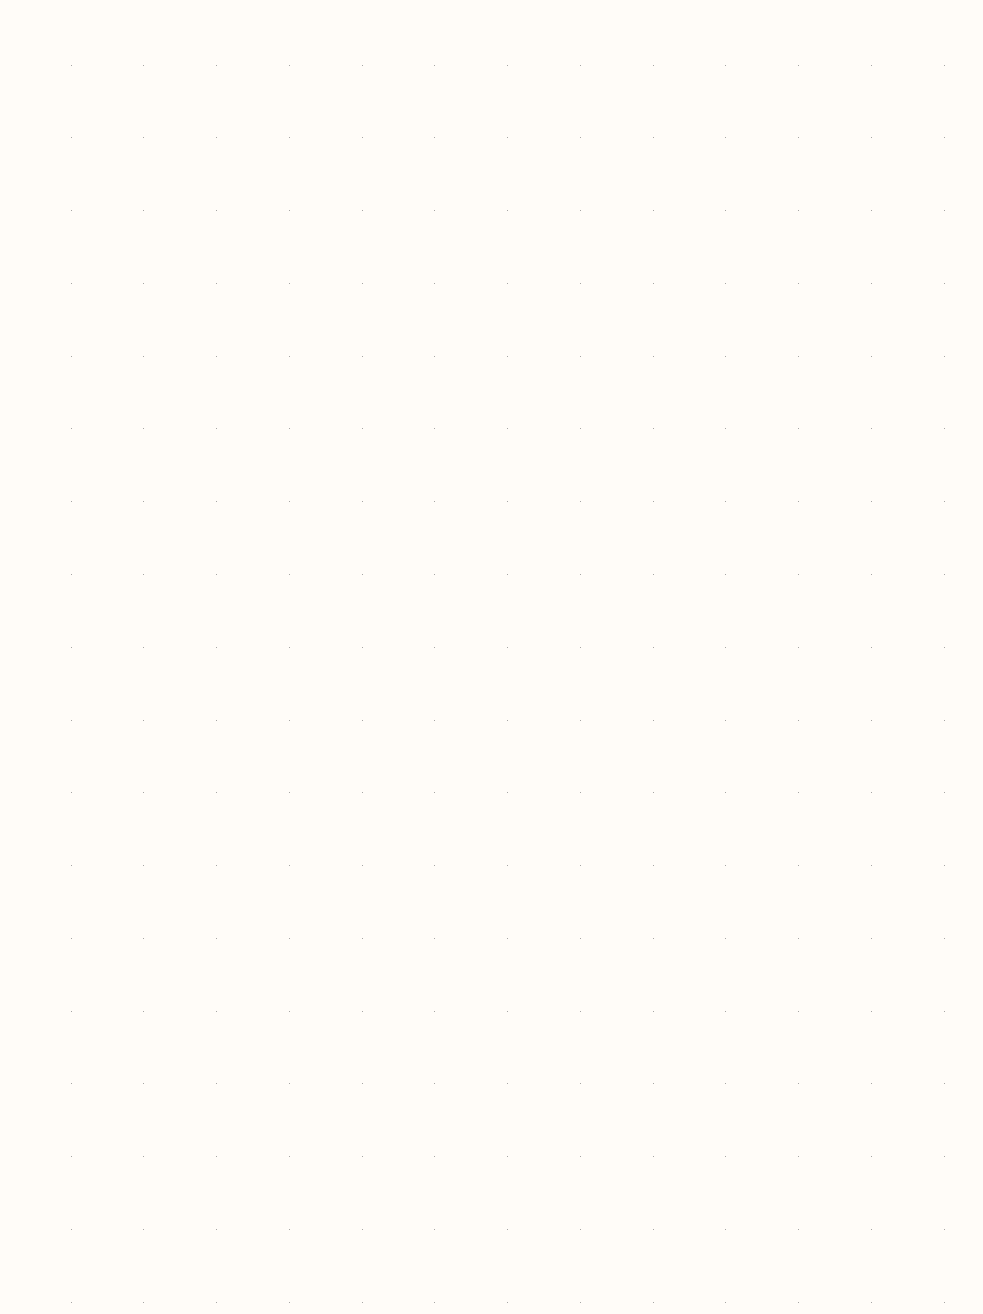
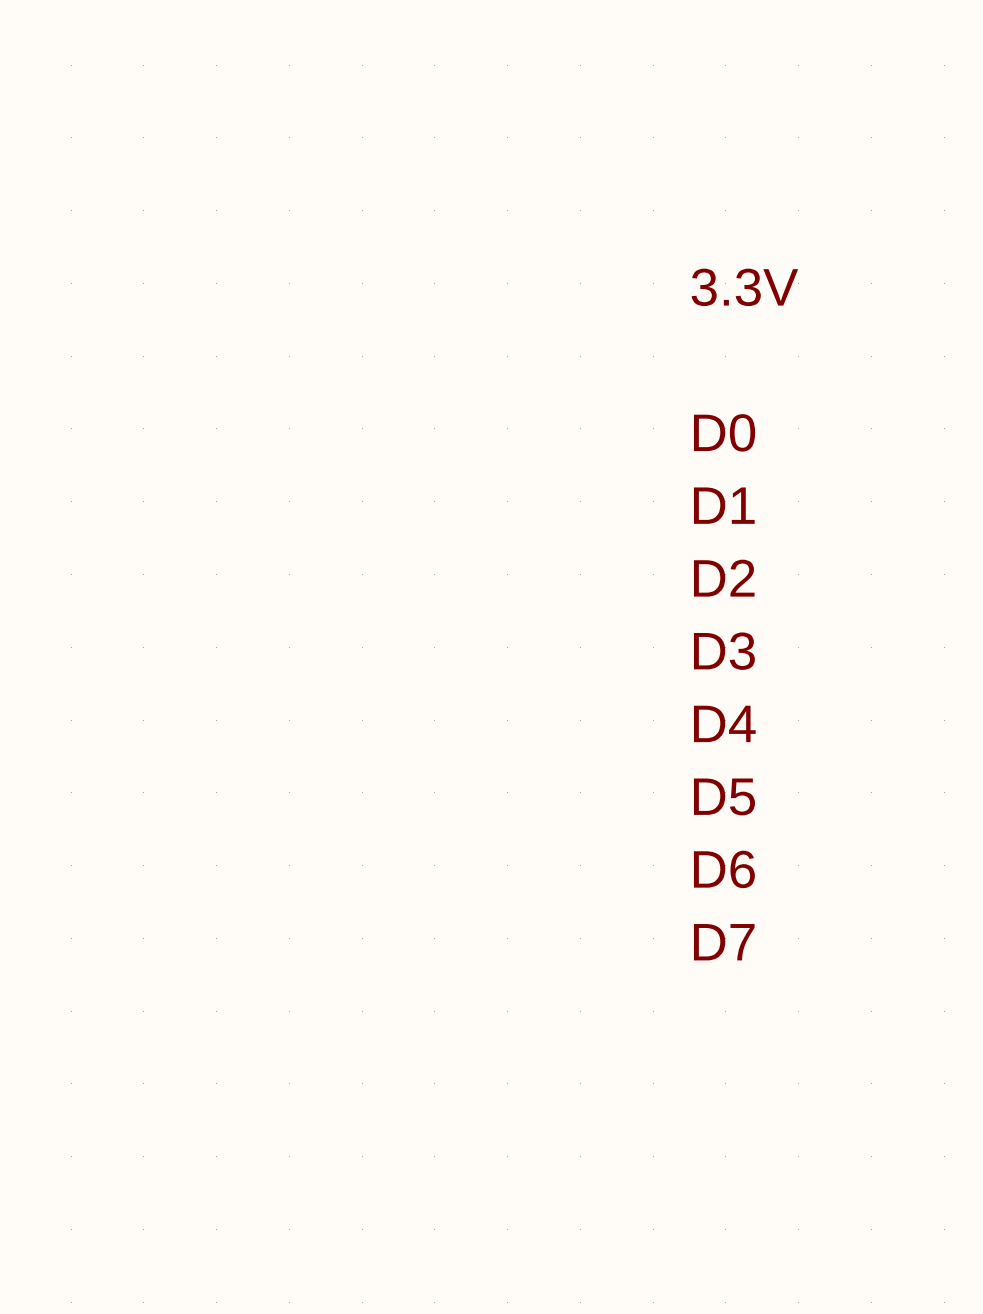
label: none -> 3.3V (744, 287)
label: none -> D0 (724, 432)
label: none -> D1 (724, 505)
label: none -> D2 (724, 578)
label: none -> D3 (724, 651)
label: none -> D4 (724, 723)
label: none -> D5 (724, 796)
label: none -> D6 (724, 869)
label: none -> D7 (724, 942)

